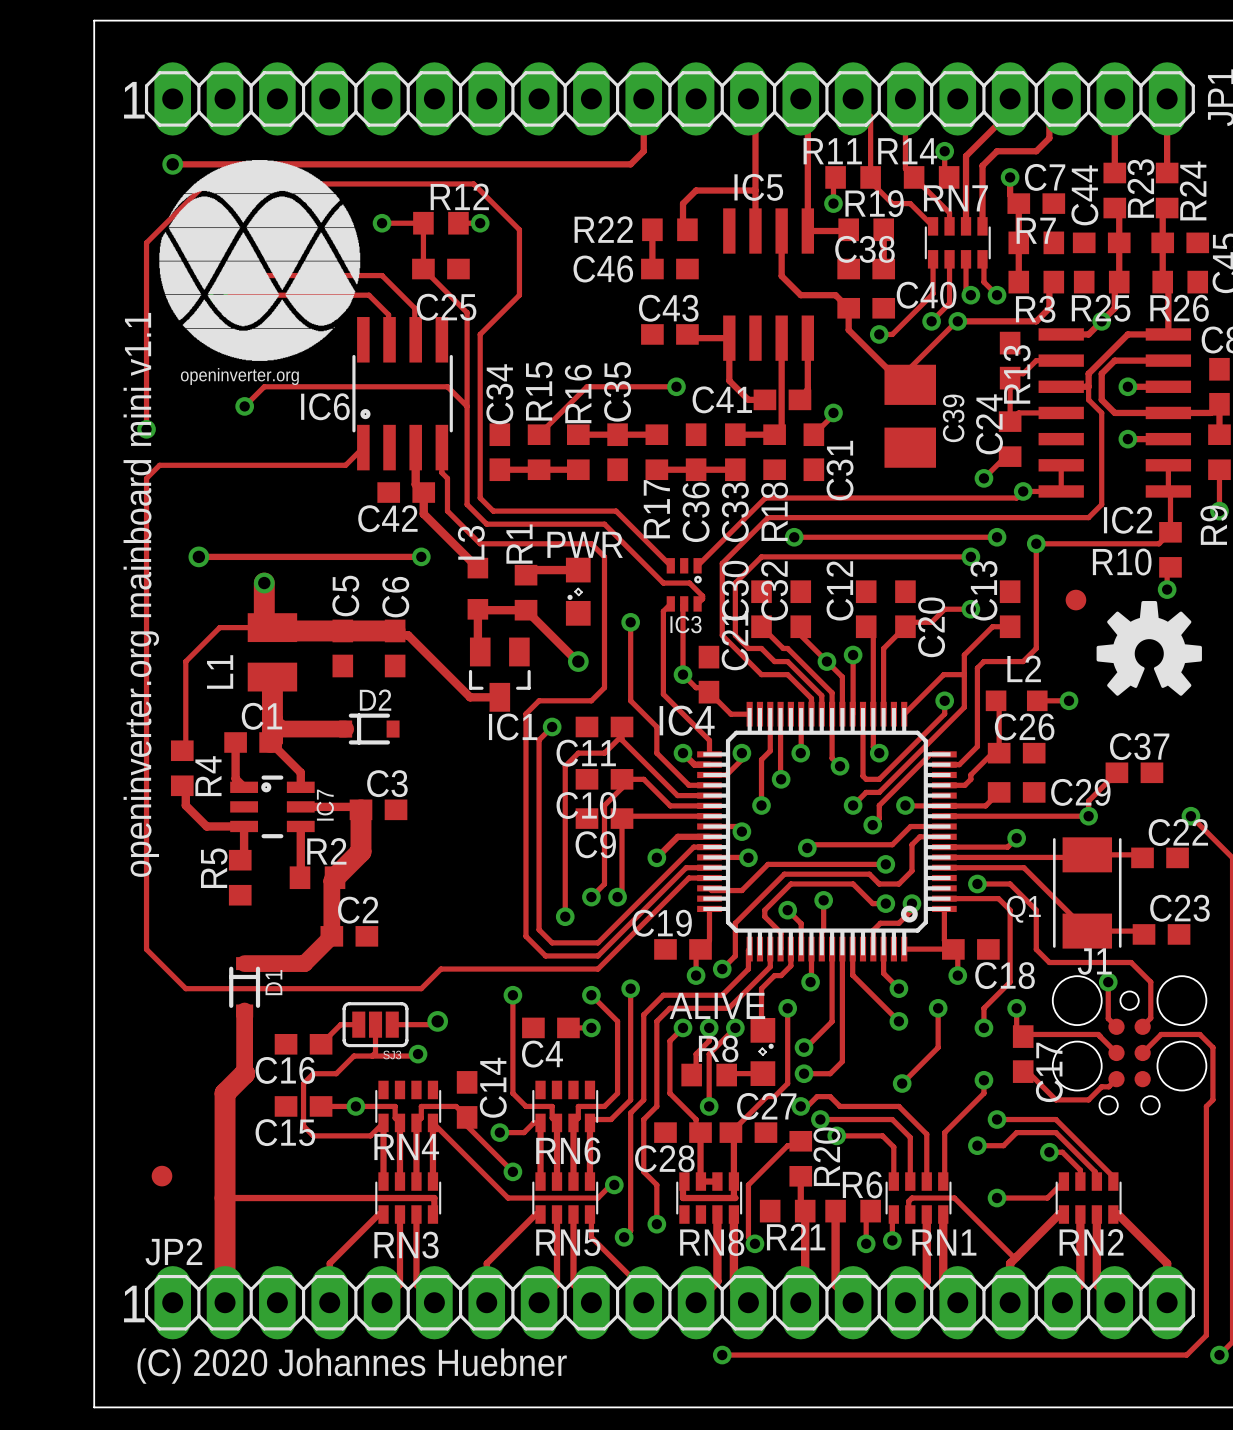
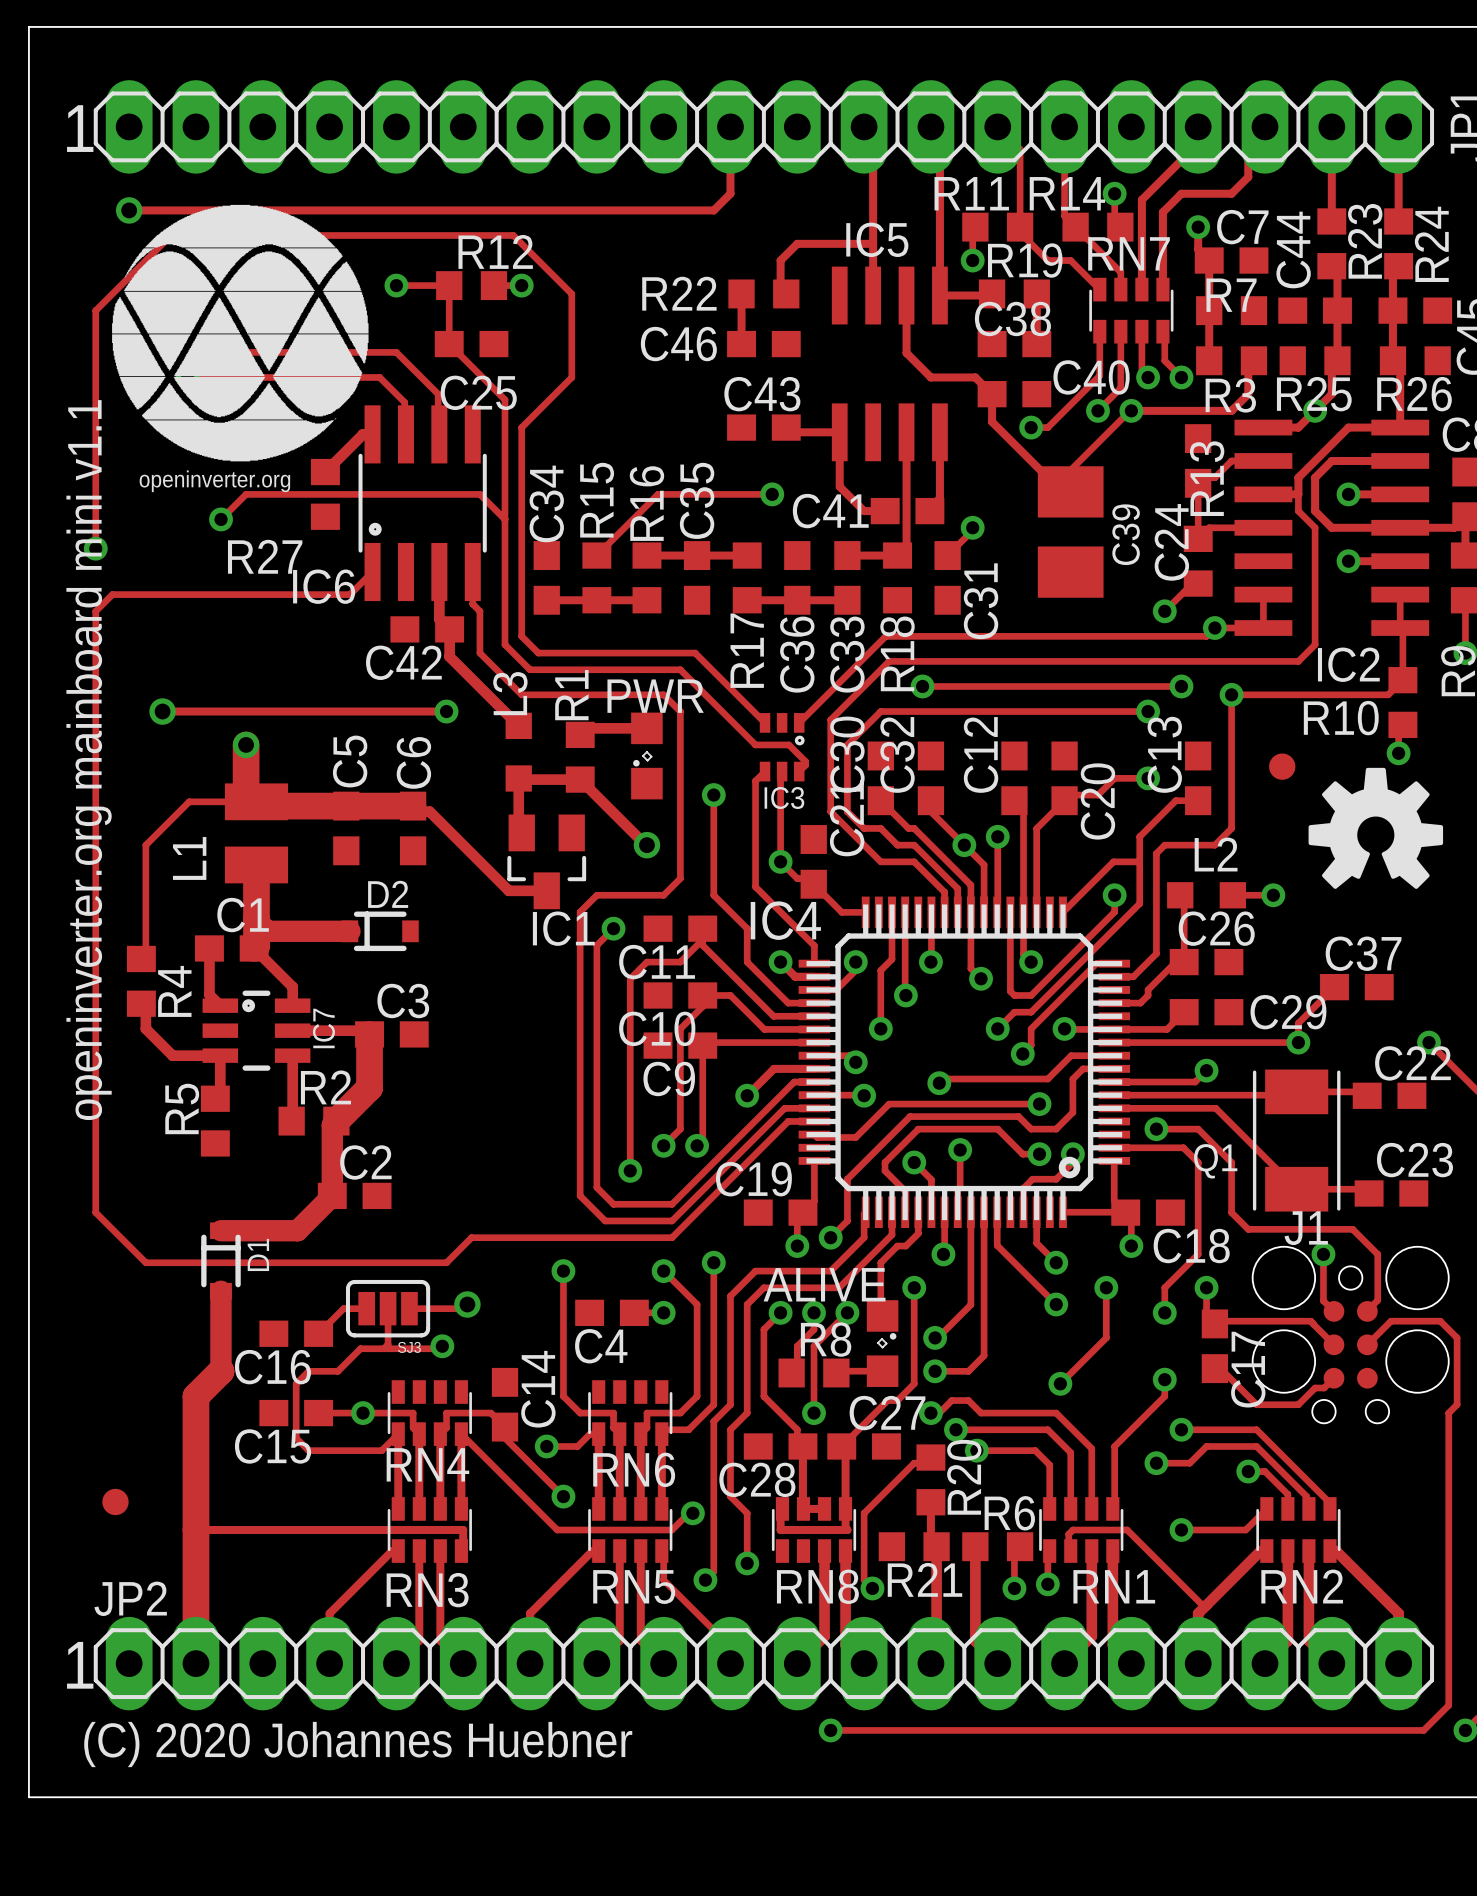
track: none -> (372, 434) (363, 434) (325, 472)
R27: none -> (325, 494)
IC6 name position: IC6 (325, 406) -> IC6 (324, 586)

